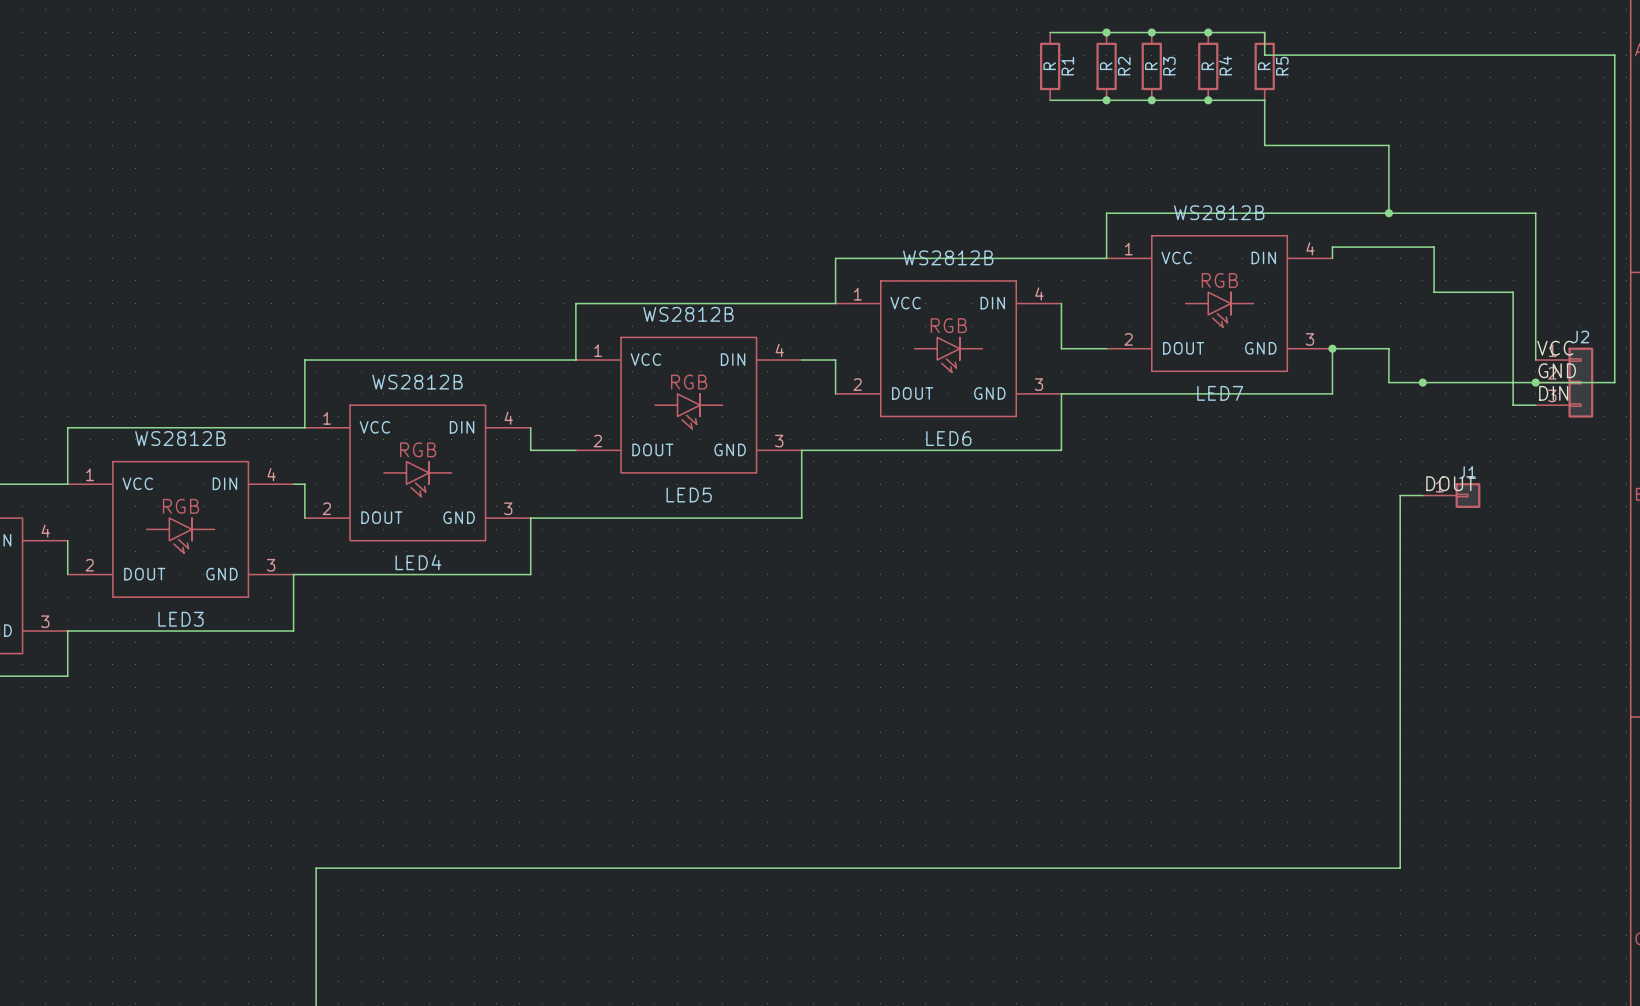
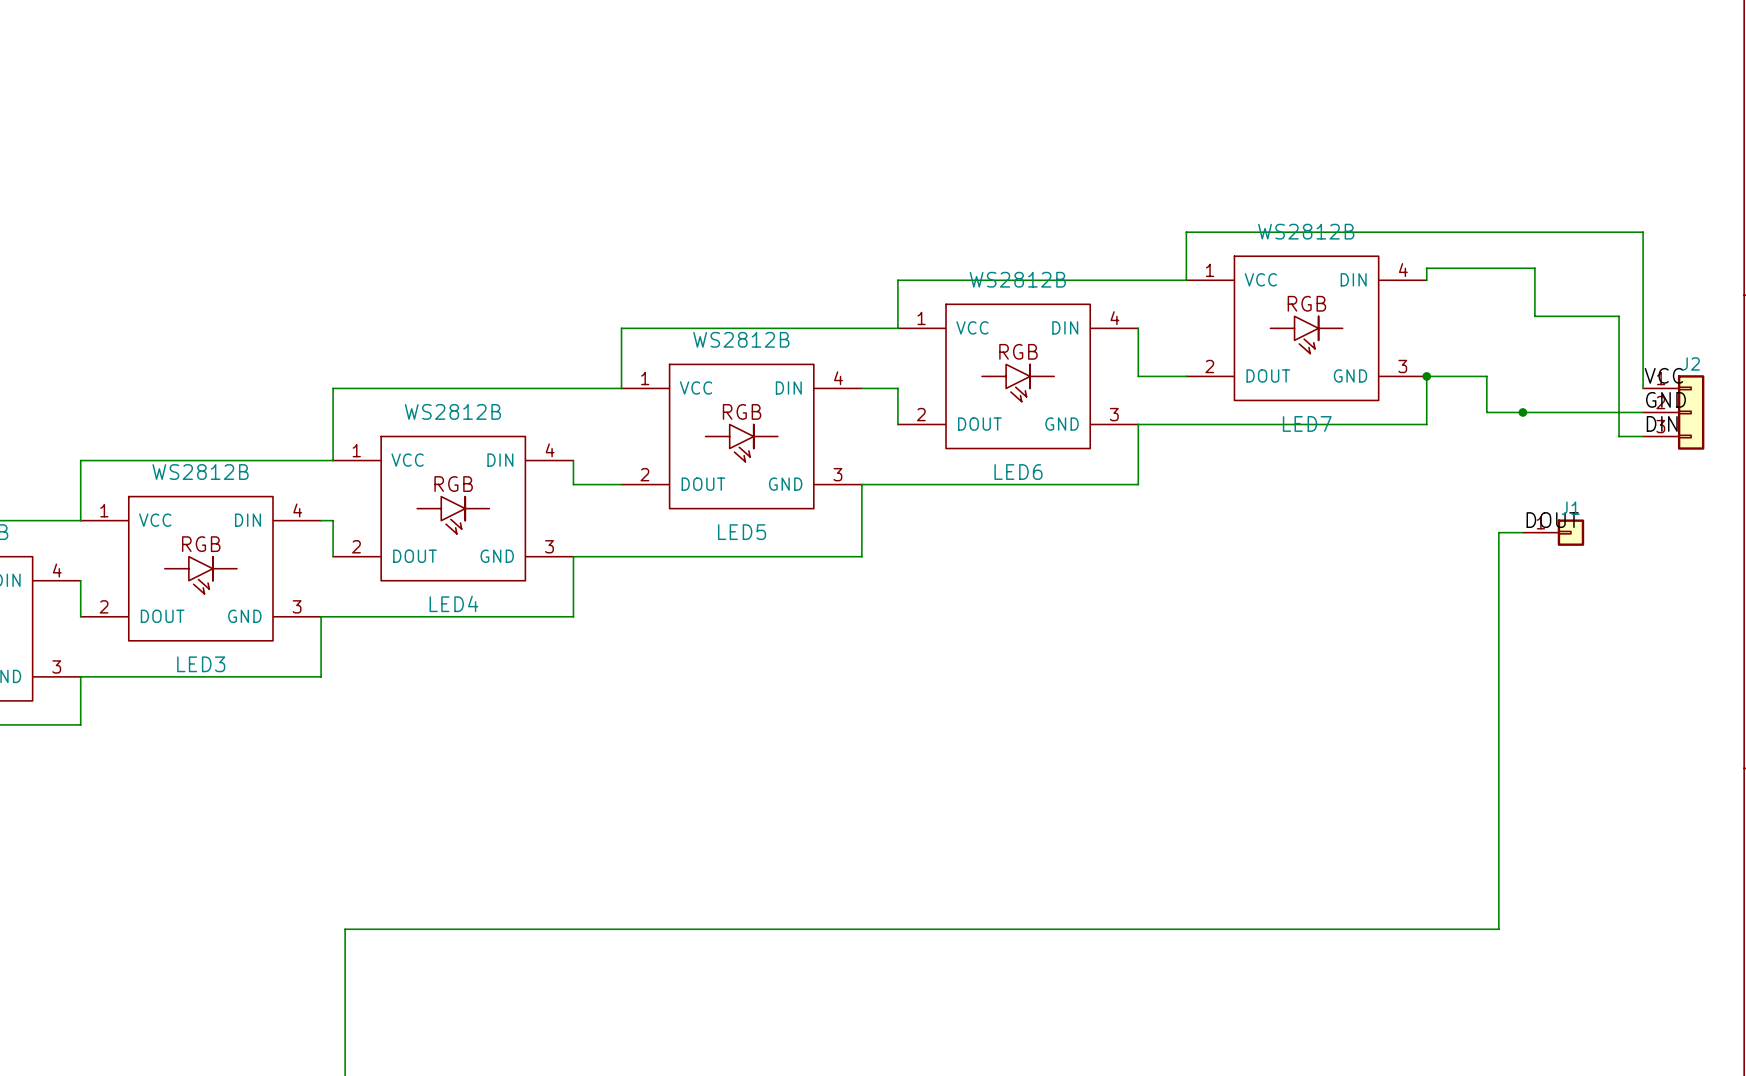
wire: (1050, 32) (1264, 32) (1264, 55) (1614, 55) (1614, 382) (1535, 382) -> none
junction: (1106, 32) -> none
junction: (1151, 32) -> none
junction: (1208, 32) -> none
R1: R (1050, 66) -> none
R2: R (1106, 66) -> none
R3: R (1151, 66) -> none
R4: R (1208, 66) -> none
R5: R (1264, 66) -> none
wire: (1050, 100) (1264, 100) (1264, 145) (1388, 145) (1388, 213) -> none
junction: (1106, 100) -> none
junction: (1151, 100) -> none
junction: (1208, 100) -> none
junction: (1388, 213) -> none
junction: (1535, 382) -> none

